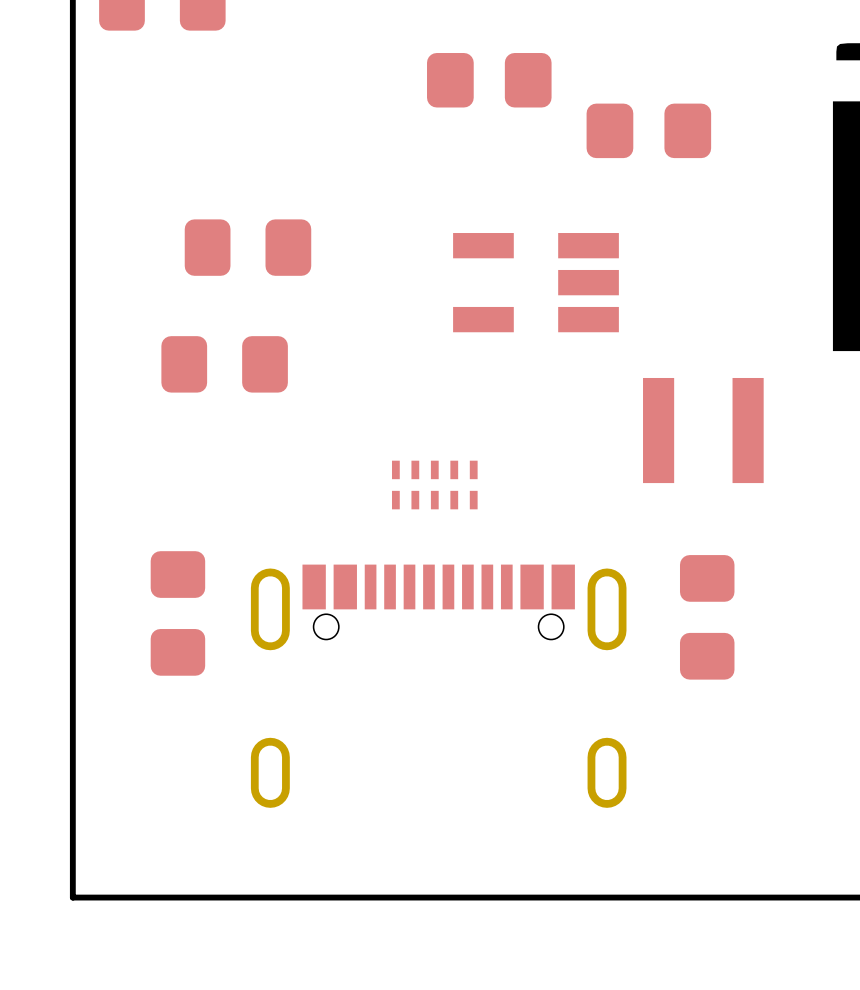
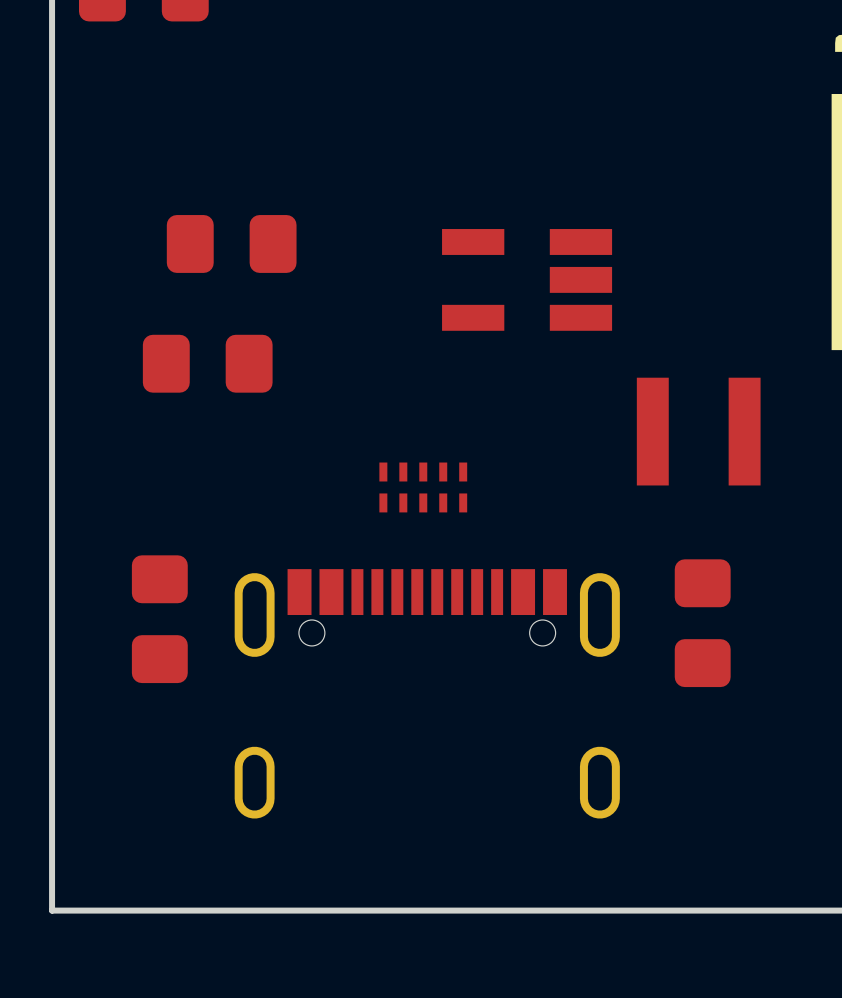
part: (489, 80) -> none
part: (648, 130) -> none

